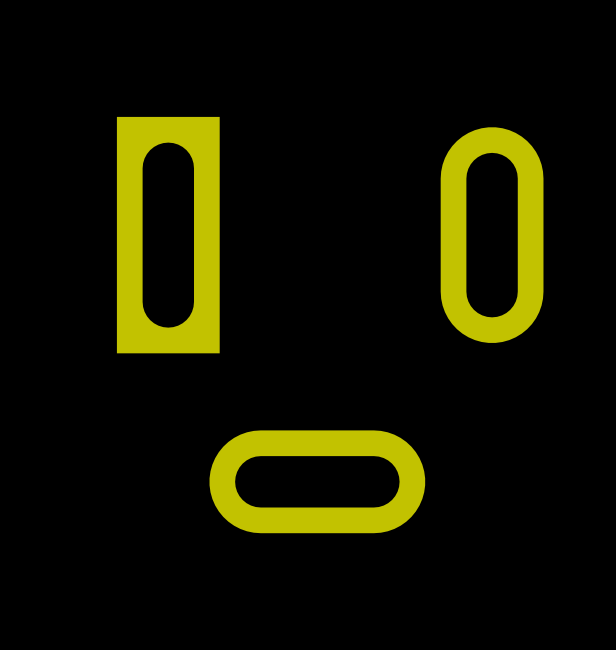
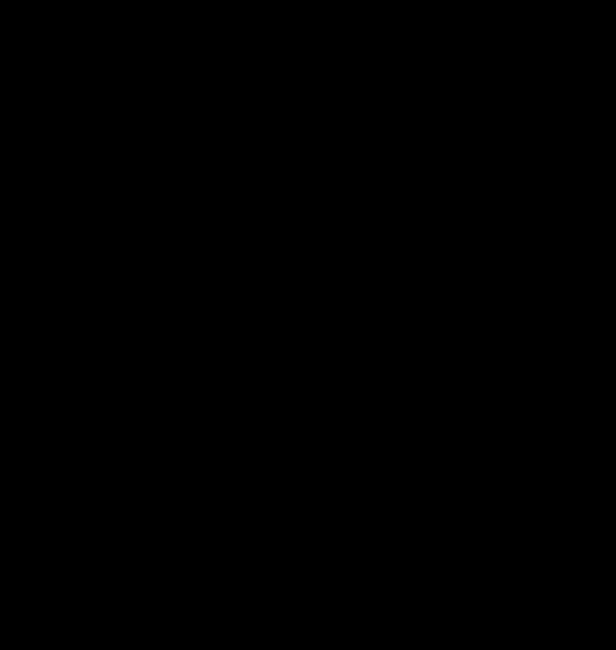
part: (330, 325) -> none

